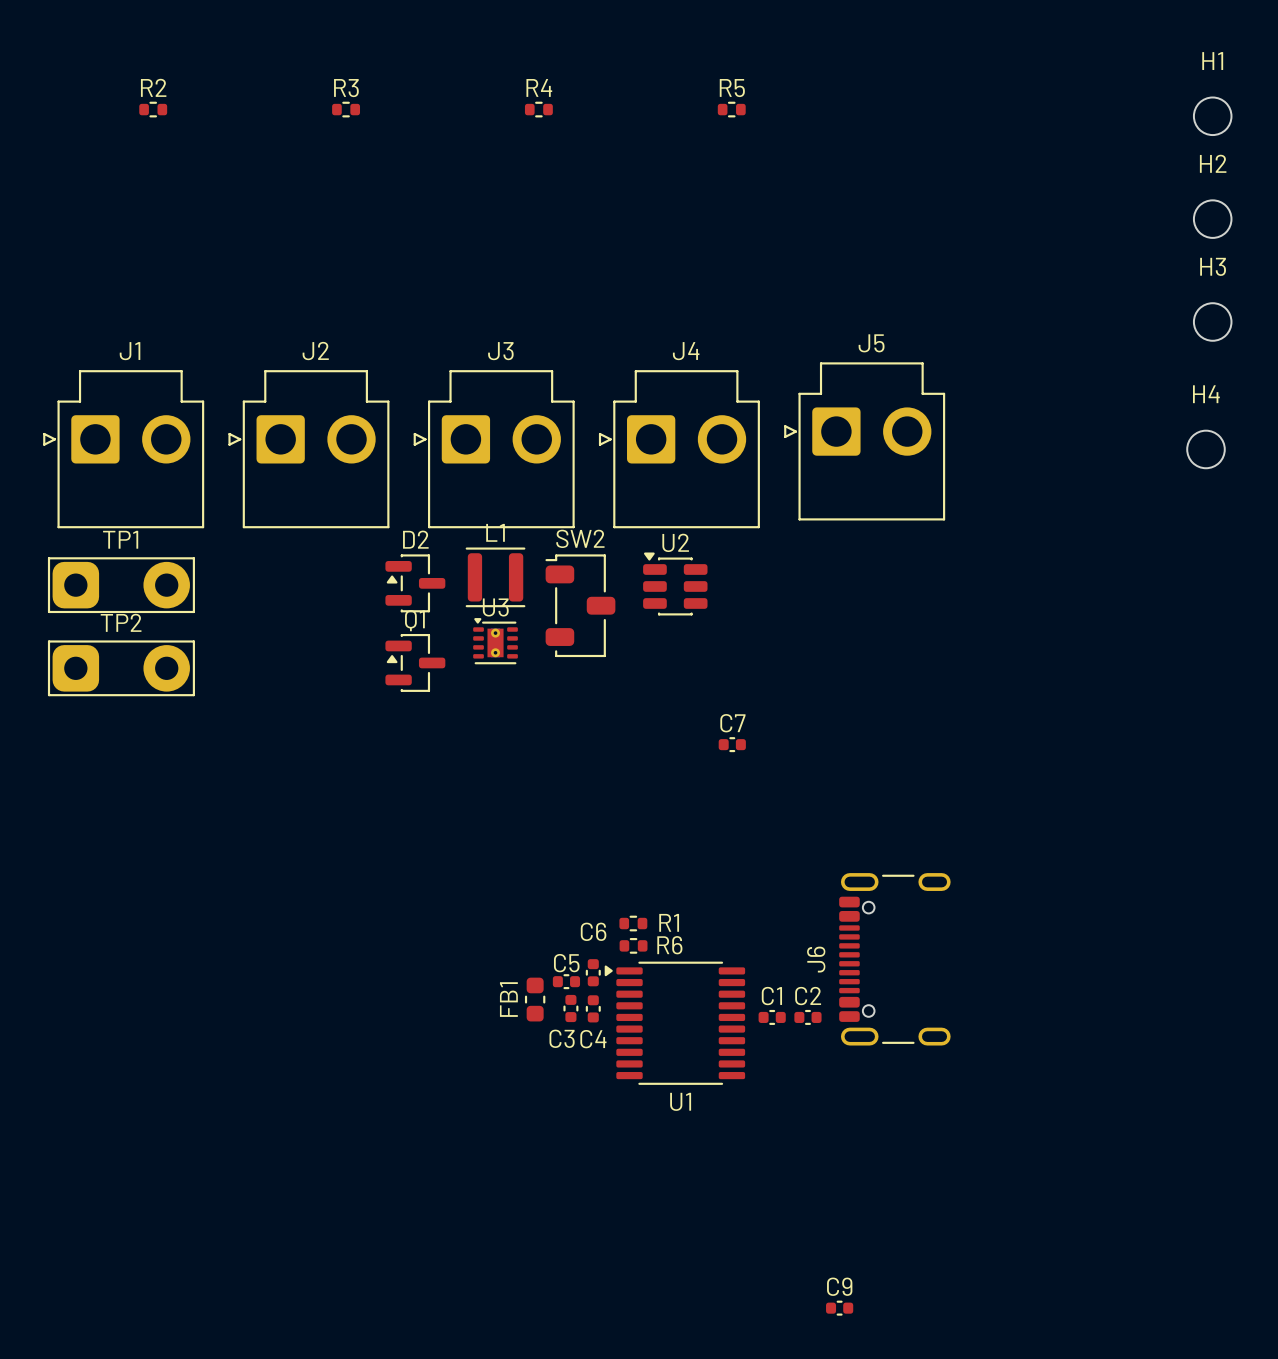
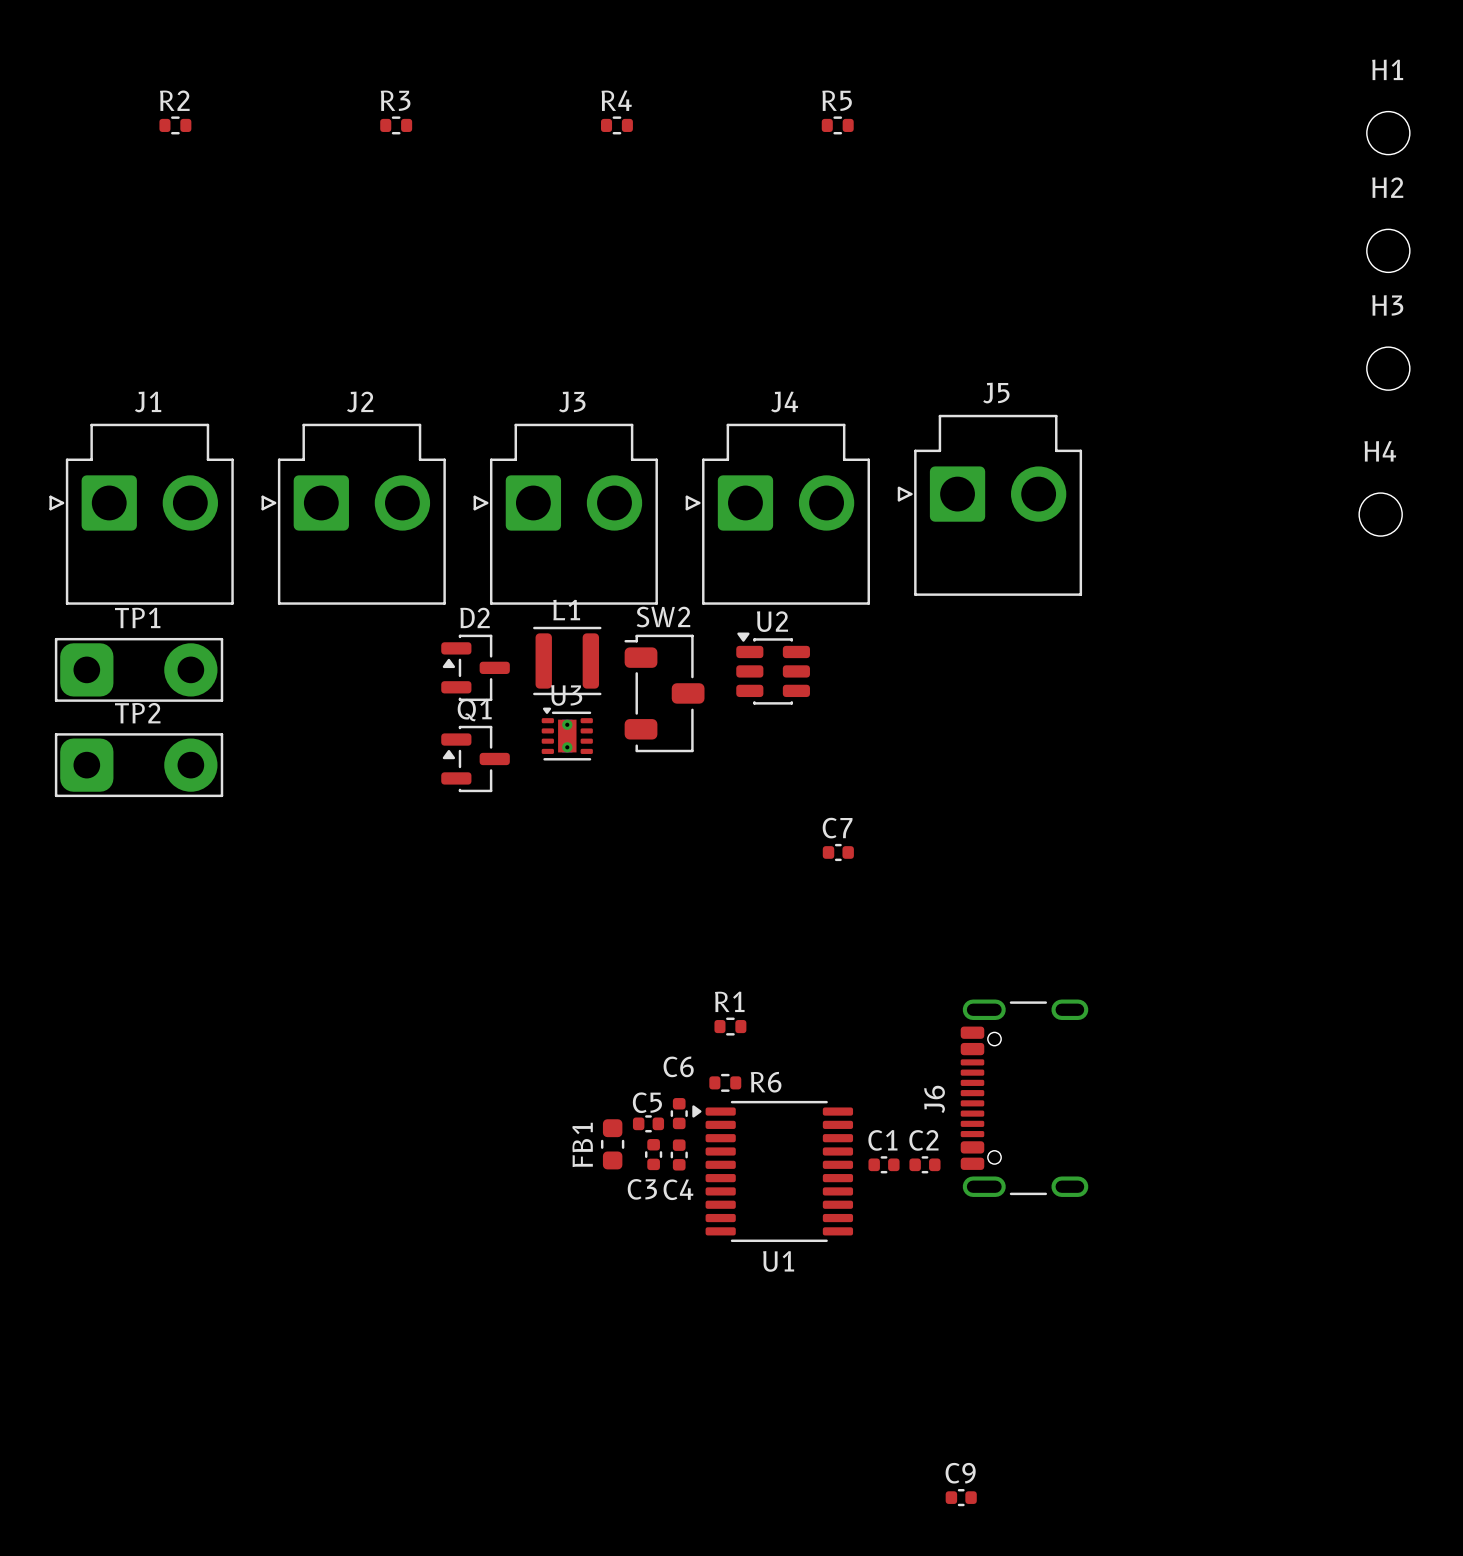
R1 name position: R1 (669, 922) -> R1 (729, 1001)
R1 position: (633, 923) -> (730, 1026)

